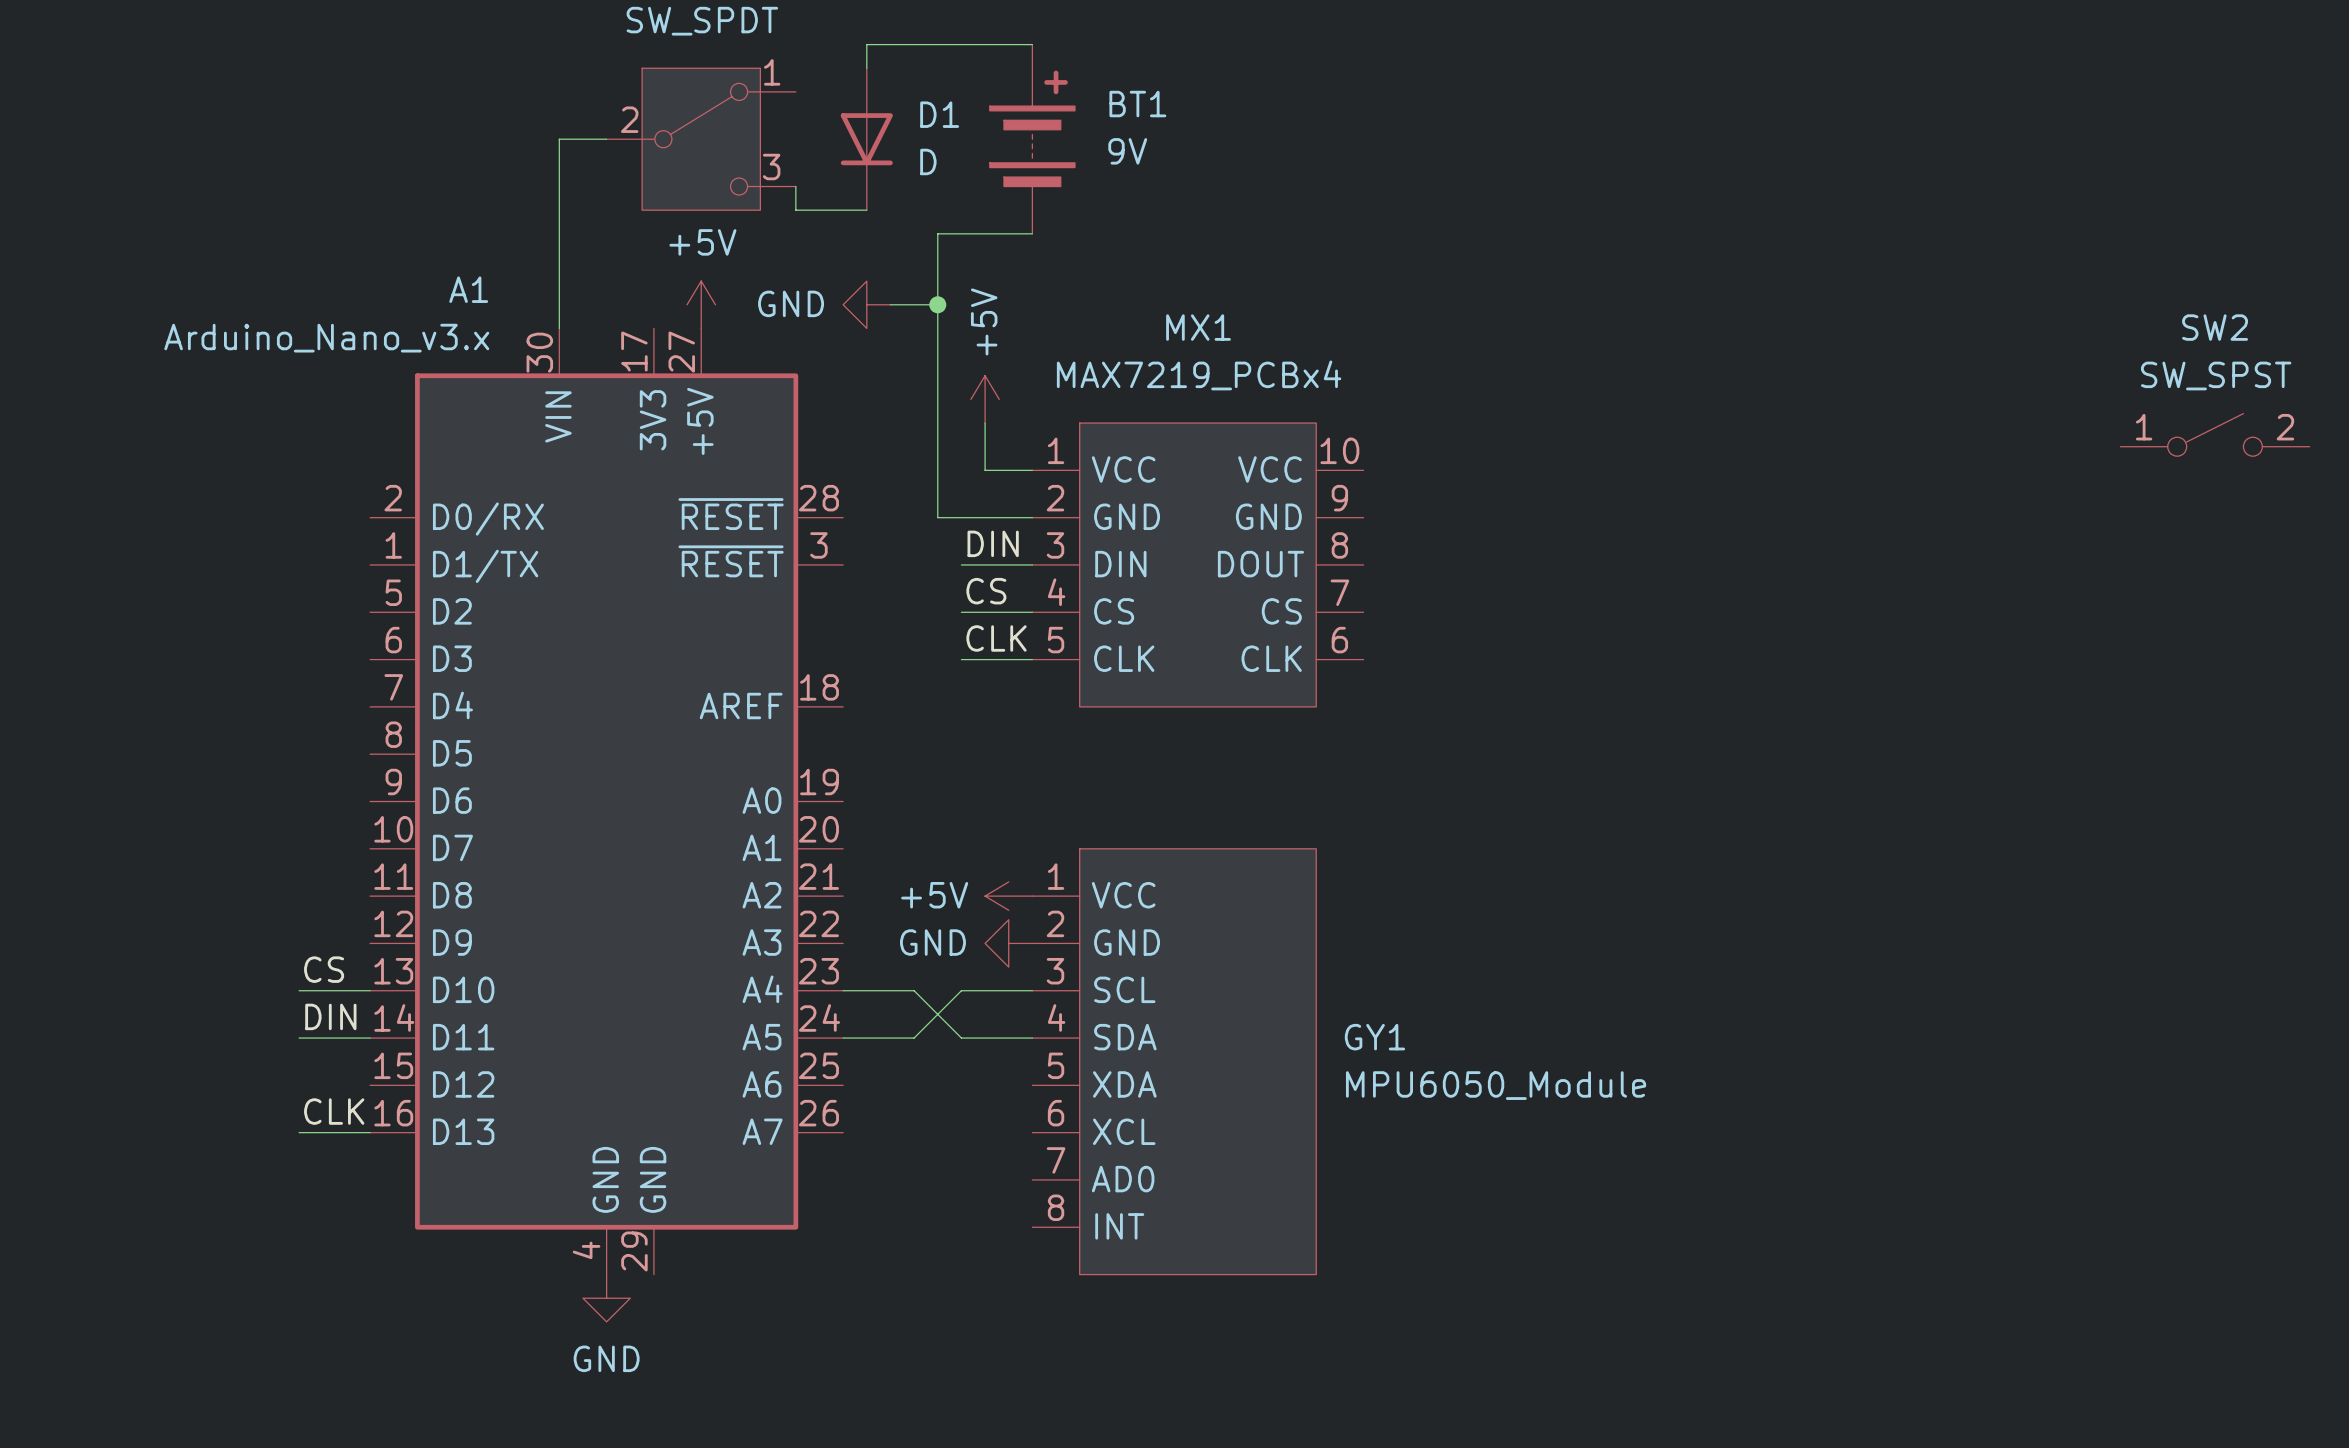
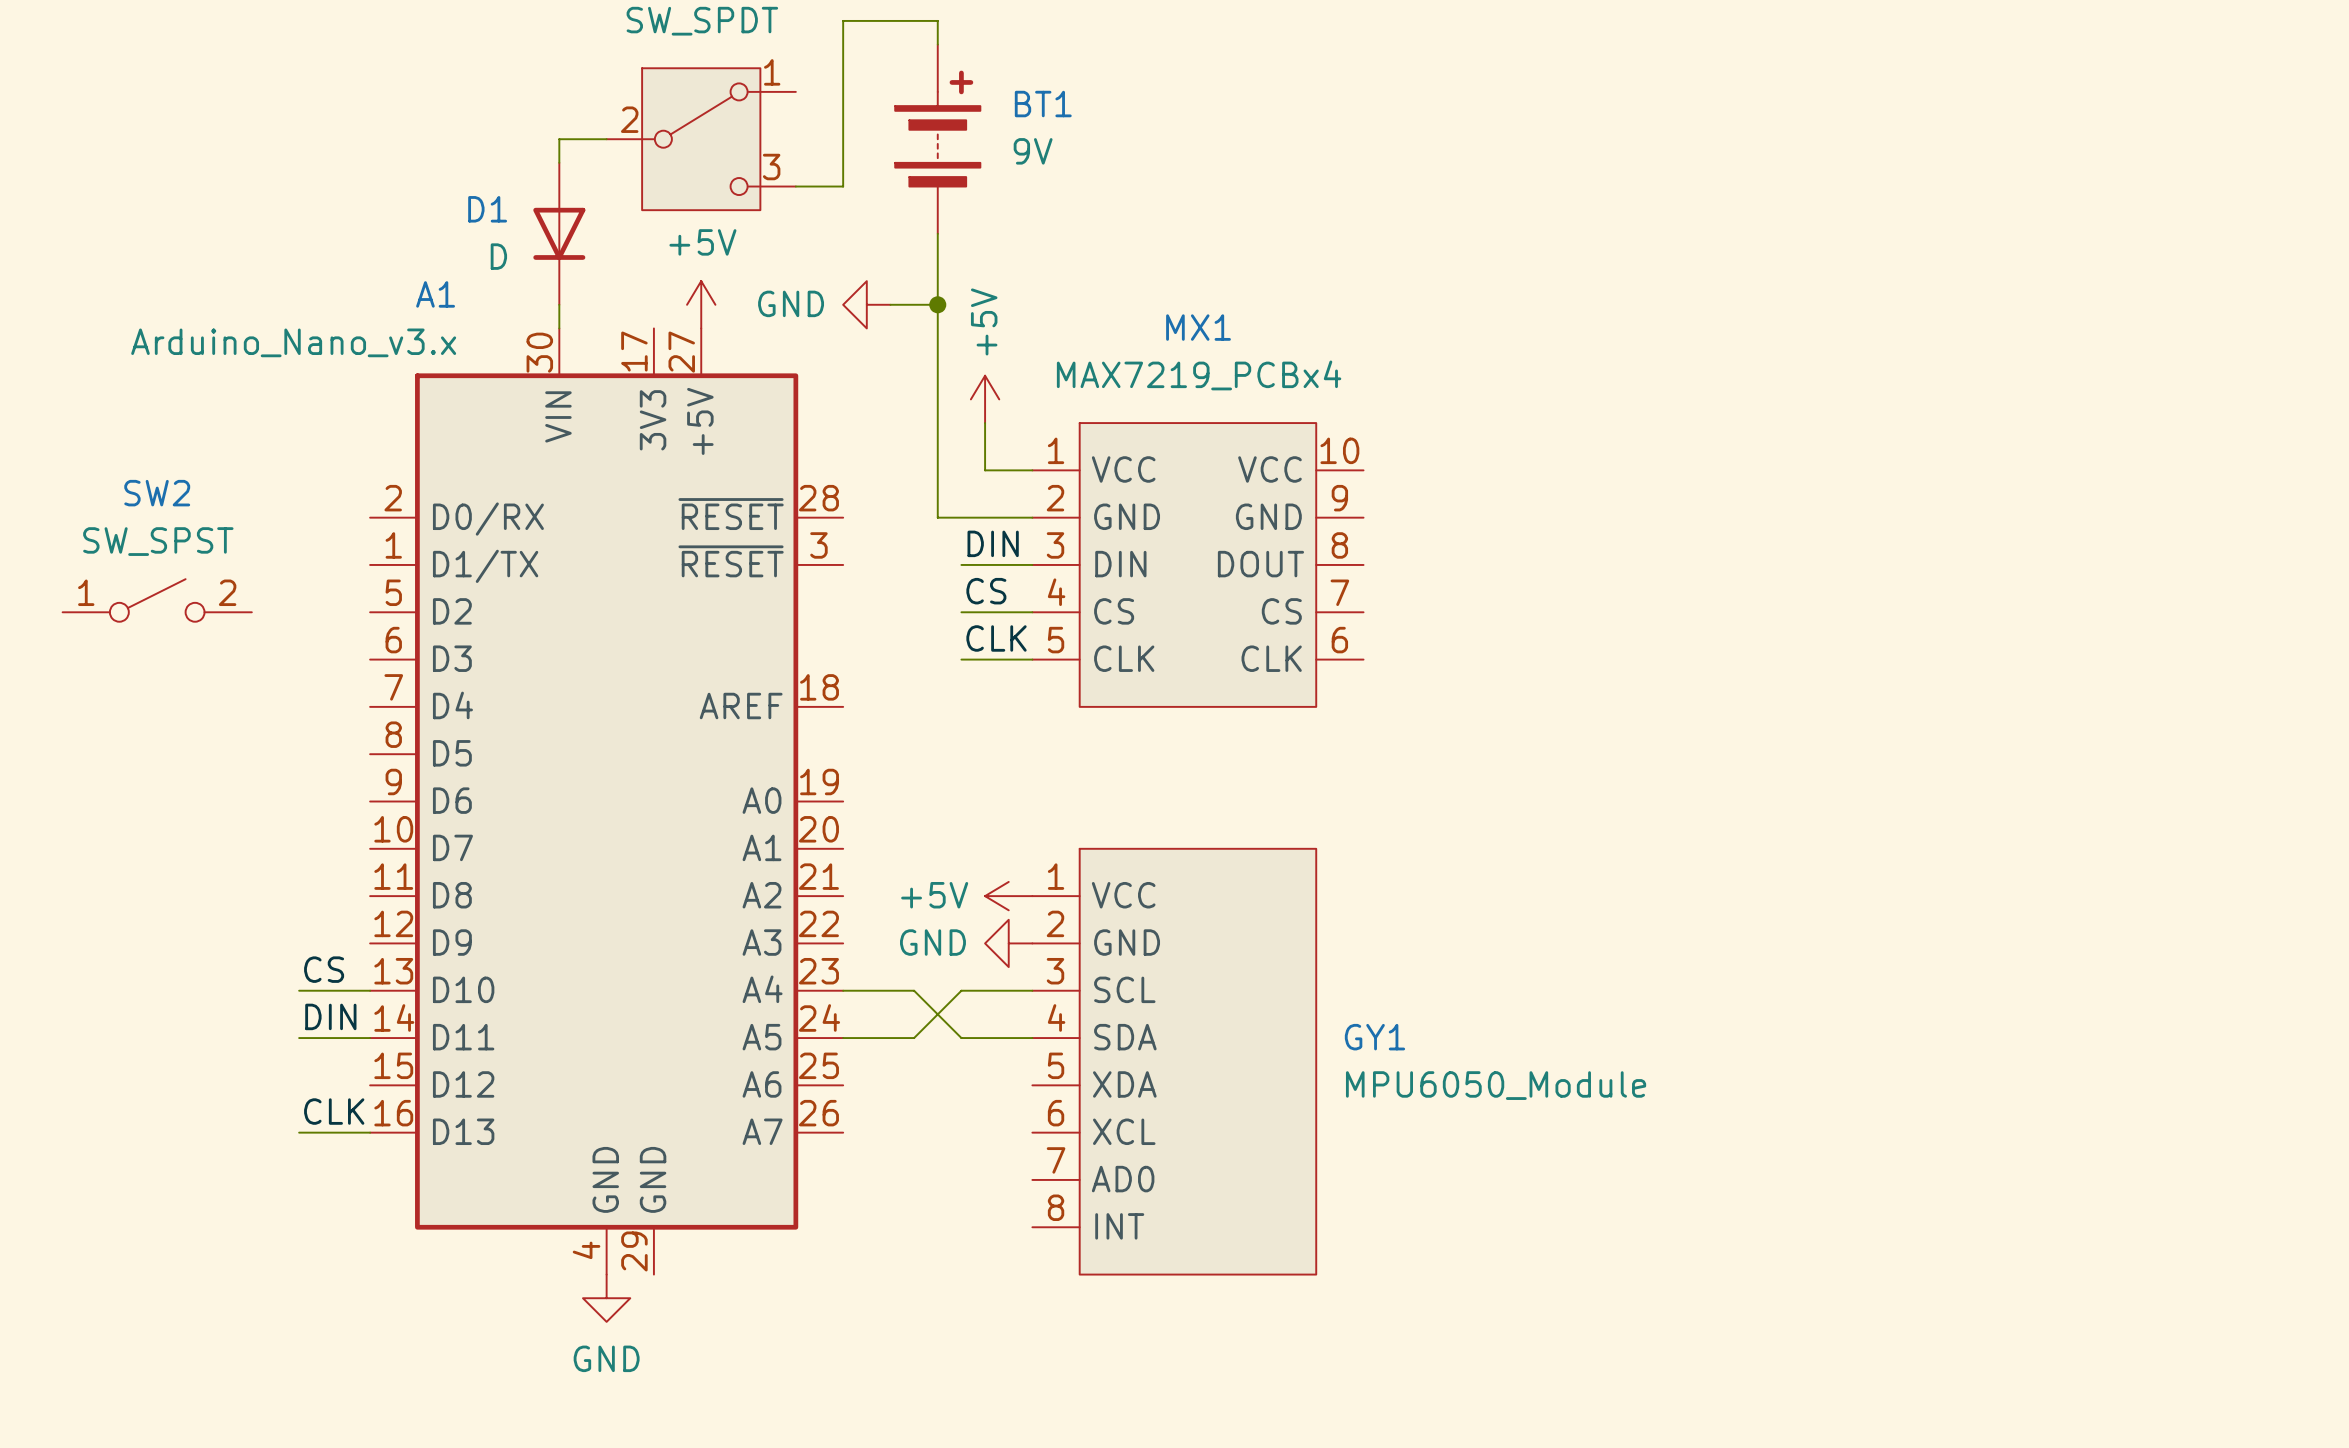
wire: (1032, 44) (866, 44) (866, 68) -> none
D1 name position: D1 (939, 114) -> D1 (487, 209)
D1 position: (866, 139) -> (559, 233)
BT1 position: (1032, 139) -> (937, 139)
D1 value position: D (928, 161) -> D (498, 256)
wire: (795, 186) (795, 210) (866, 210) -> (795, 186) (843, 186) (843, 20) (937, 20) (937, 44)
wire: (937, 233) (1032, 233) -> none
A1 name position: A1 (468, 289) -> A1 (435, 294)
A1 value position: Arduino_Nano_v3.x (326, 338) -> Arduino_Nano_v3.x (293, 342)
SW2 position: (2215, 434) -> (157, 600)

